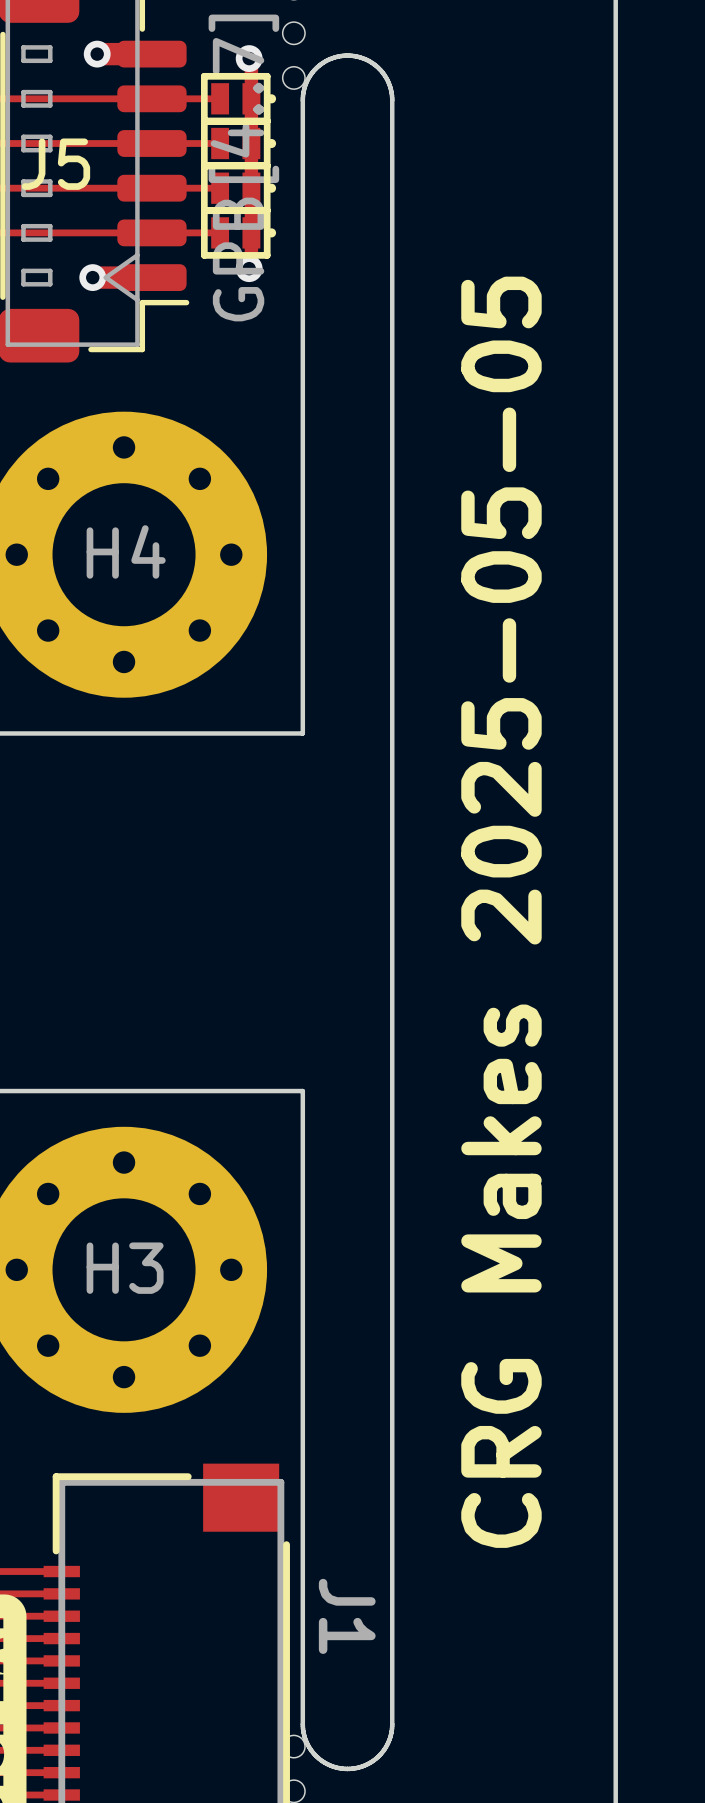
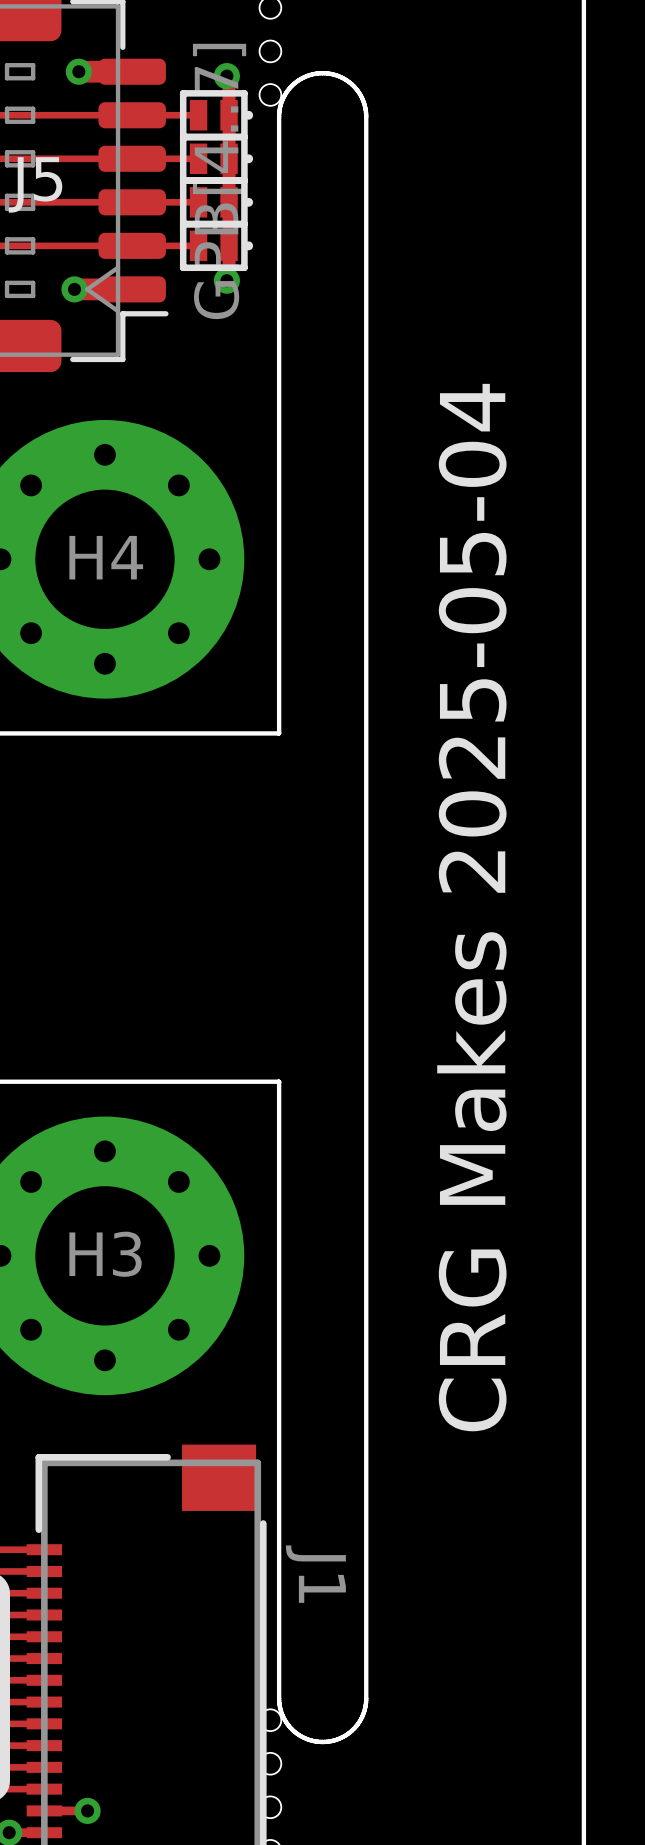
text: CRG Makes 2025-05-05 (501, 912) -> CRG Makes 2025-05-04 (471, 907)

